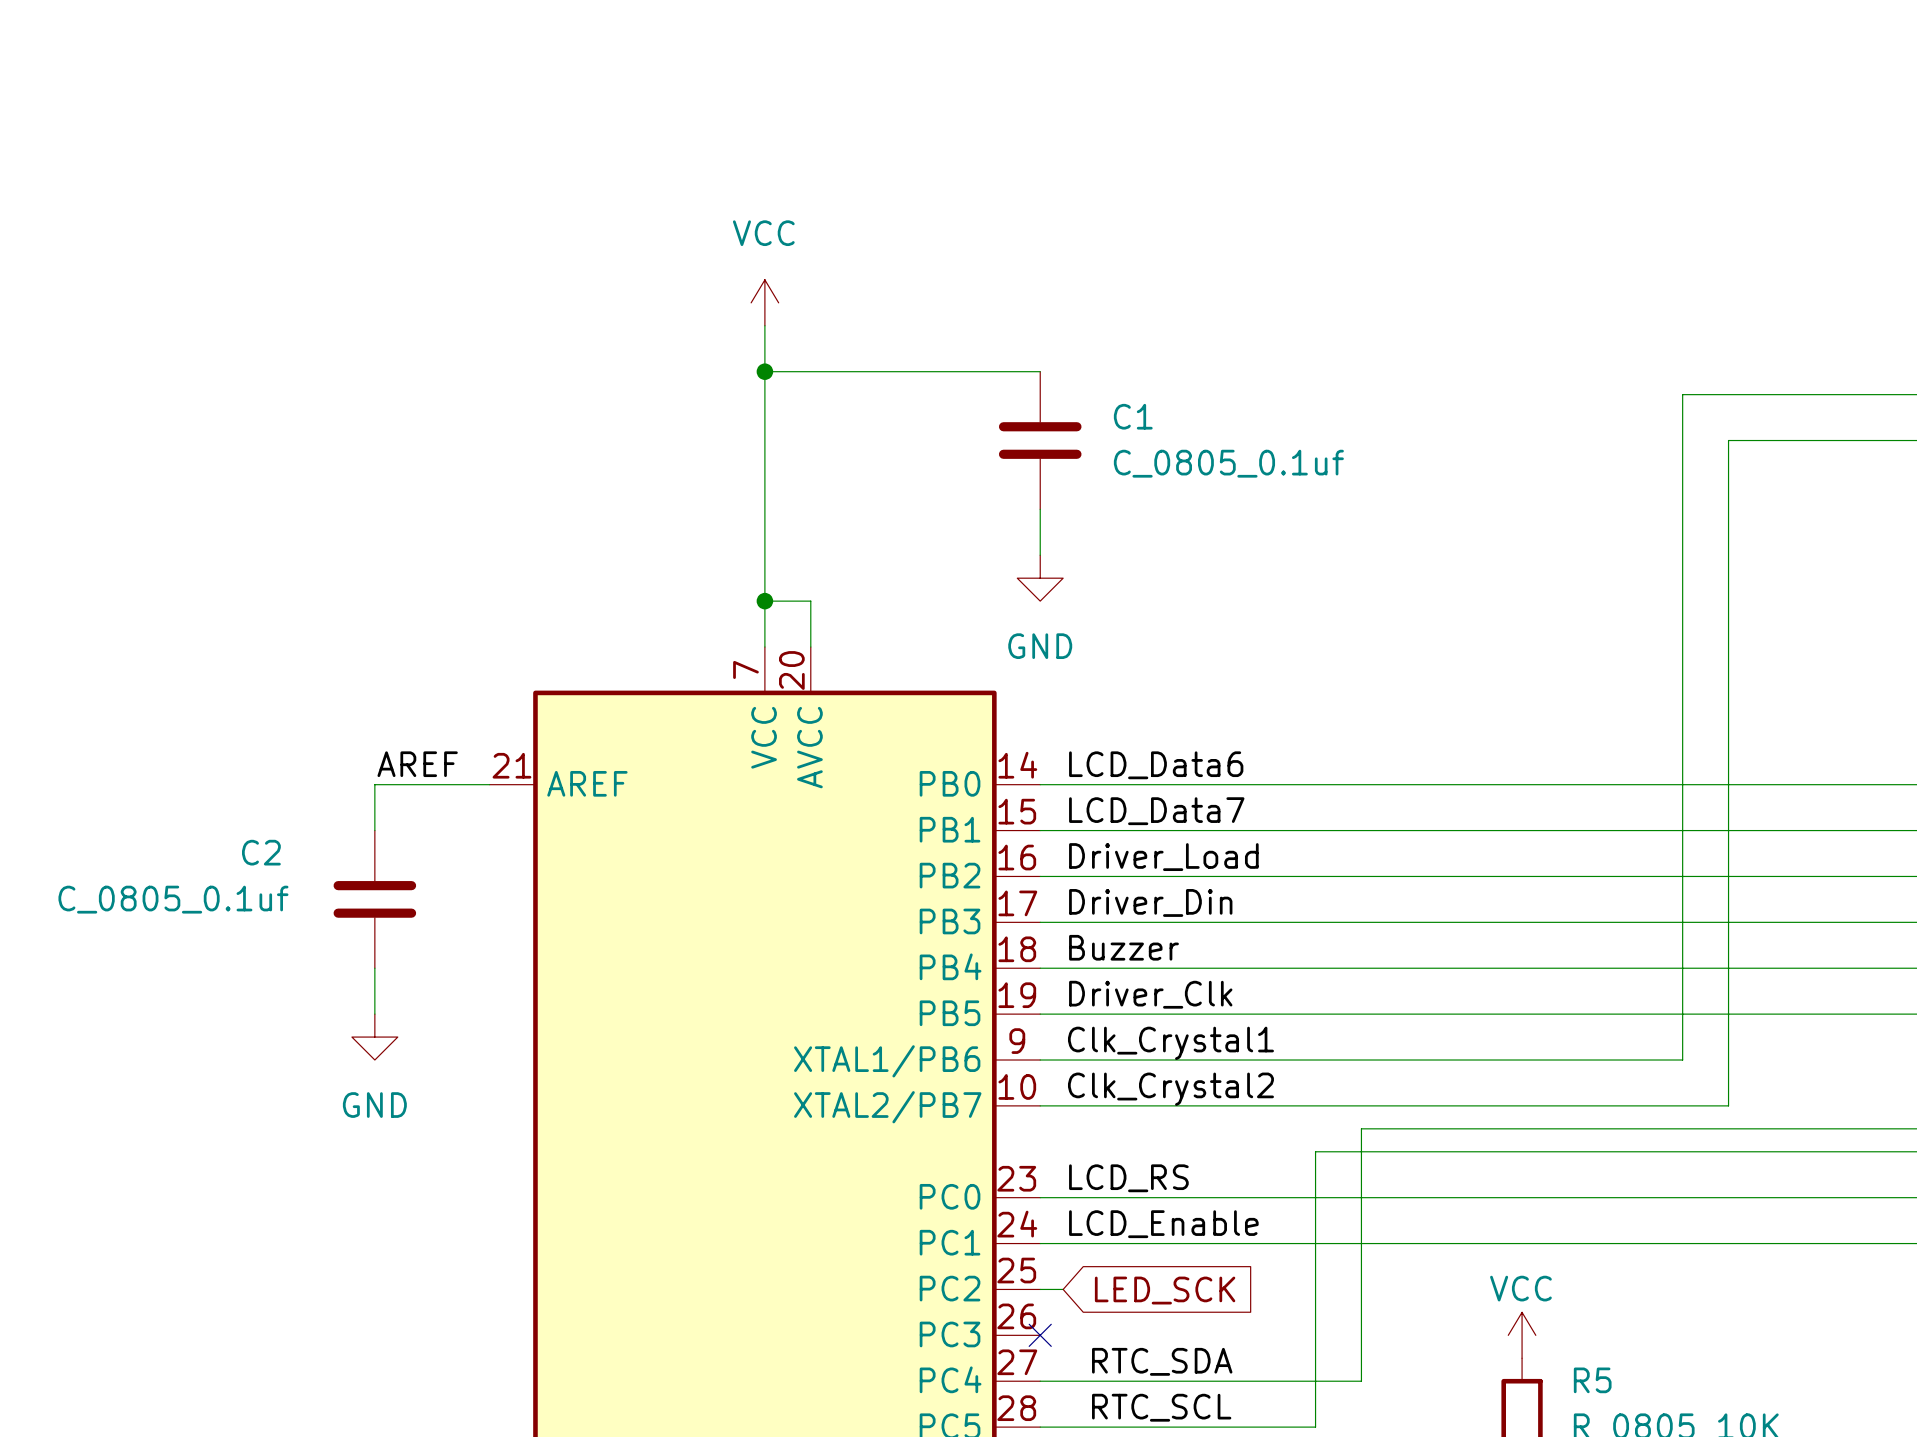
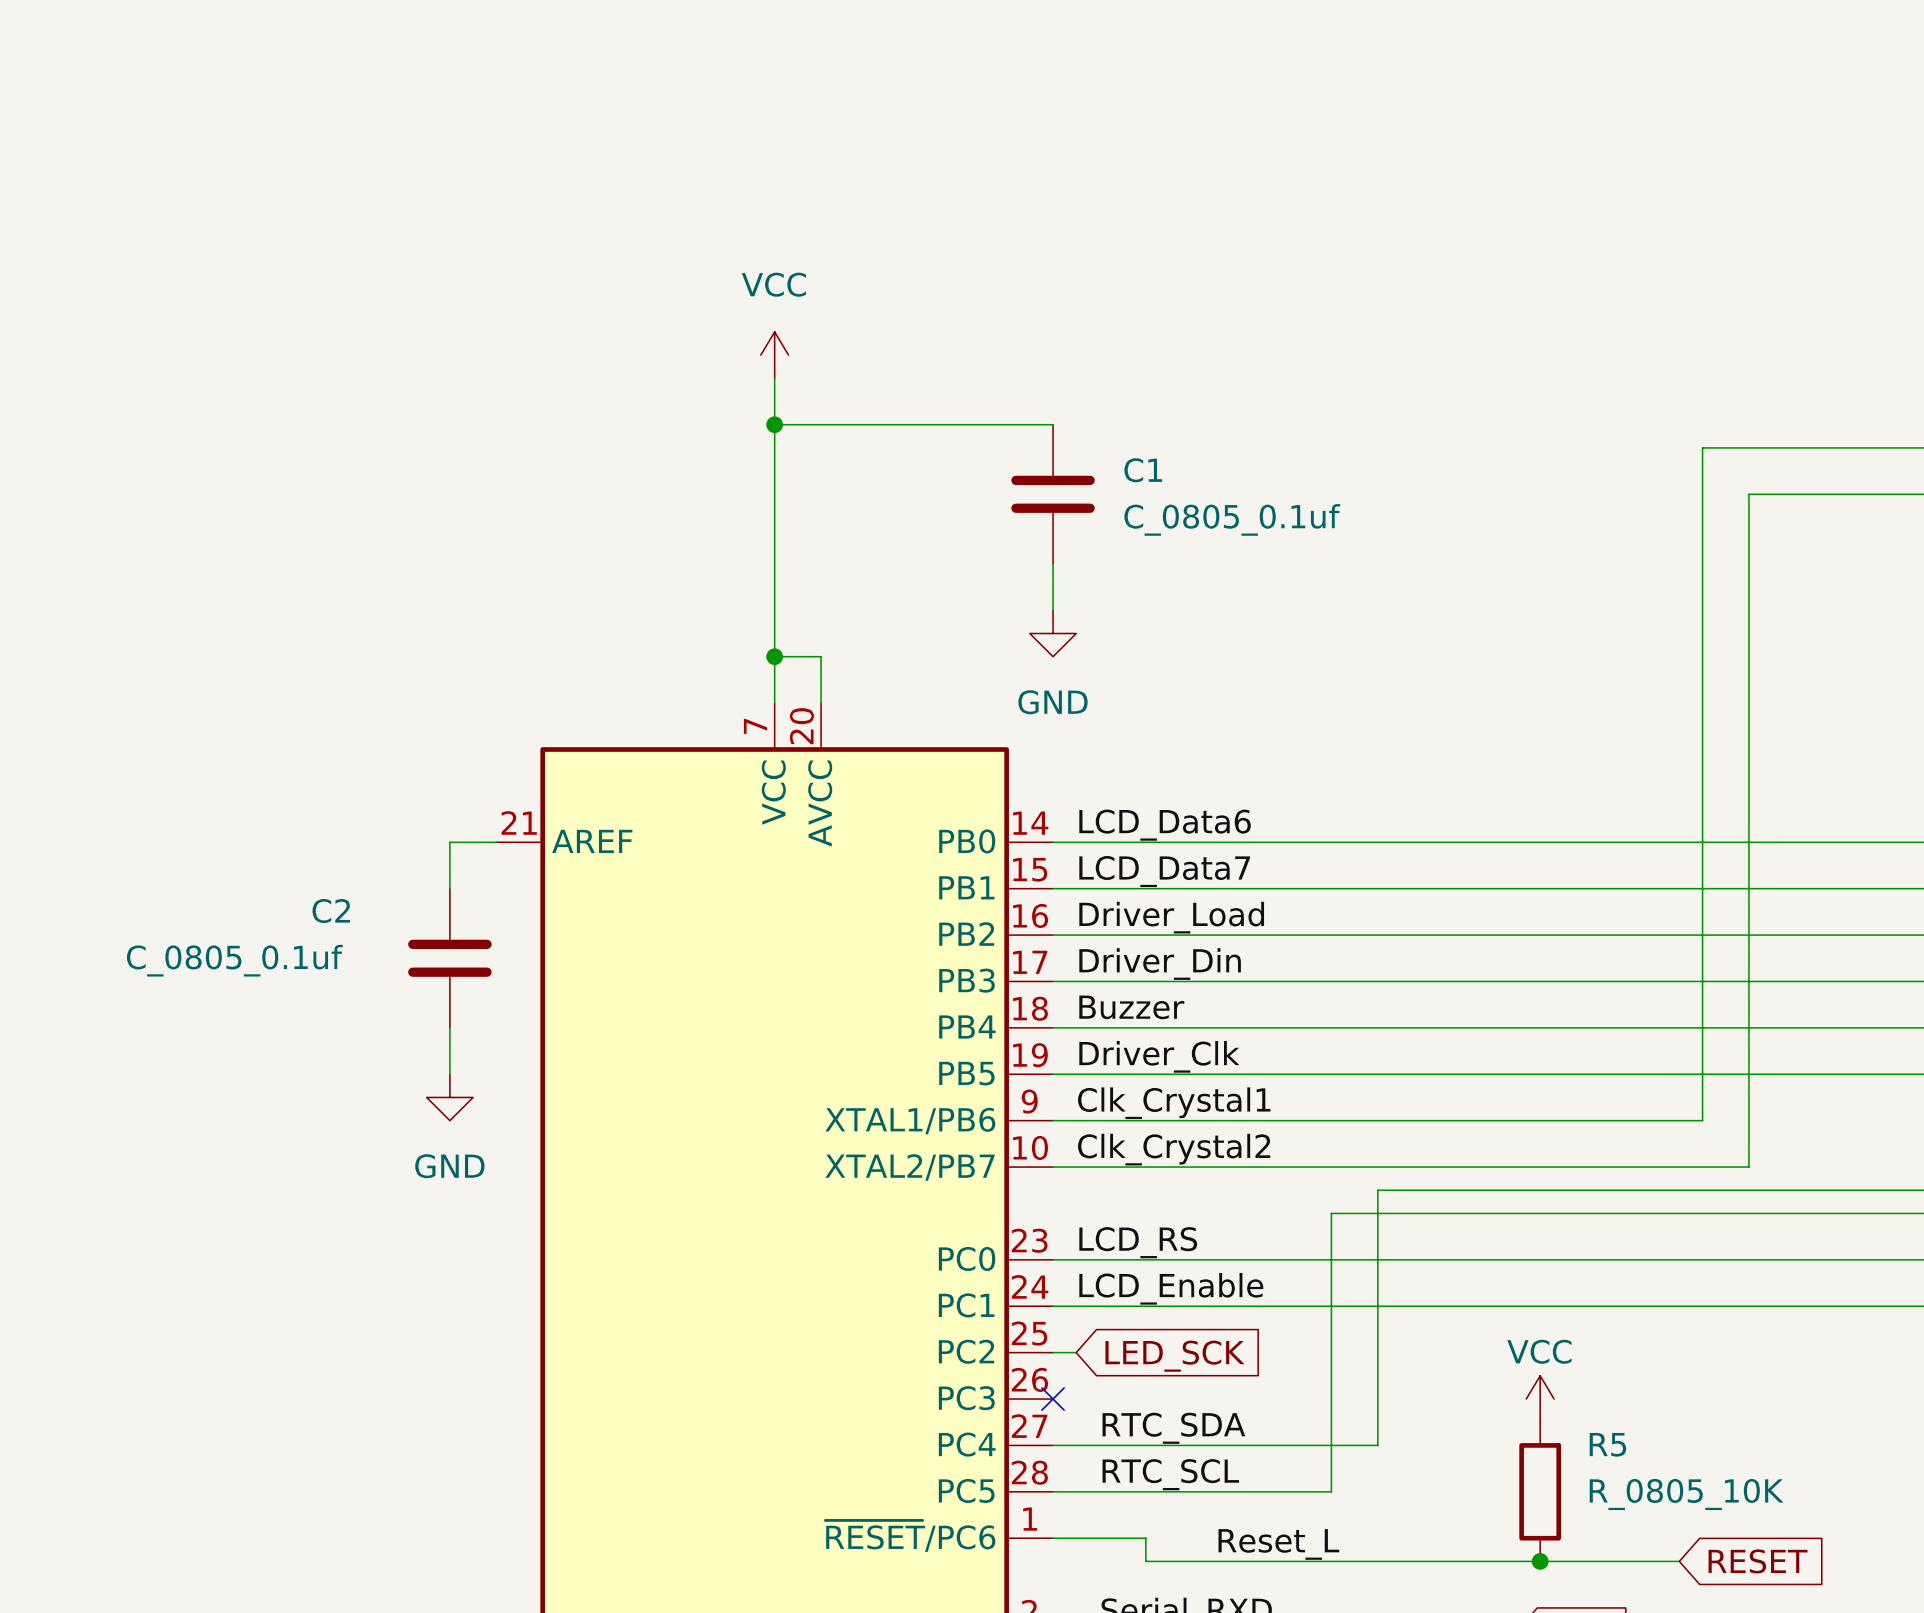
label: AREF (417, 764) -> none
wire: (443, 784) (374, 784) (374, 830) -> (449, 842) (449, 888)
C2 position: (374, 899) -> (449, 958)
wire: (374, 968) (374, 1014) -> (449, 1027) (449, 1074)
power symbol position: GND (374, 1037) -> GND (449, 1097)

